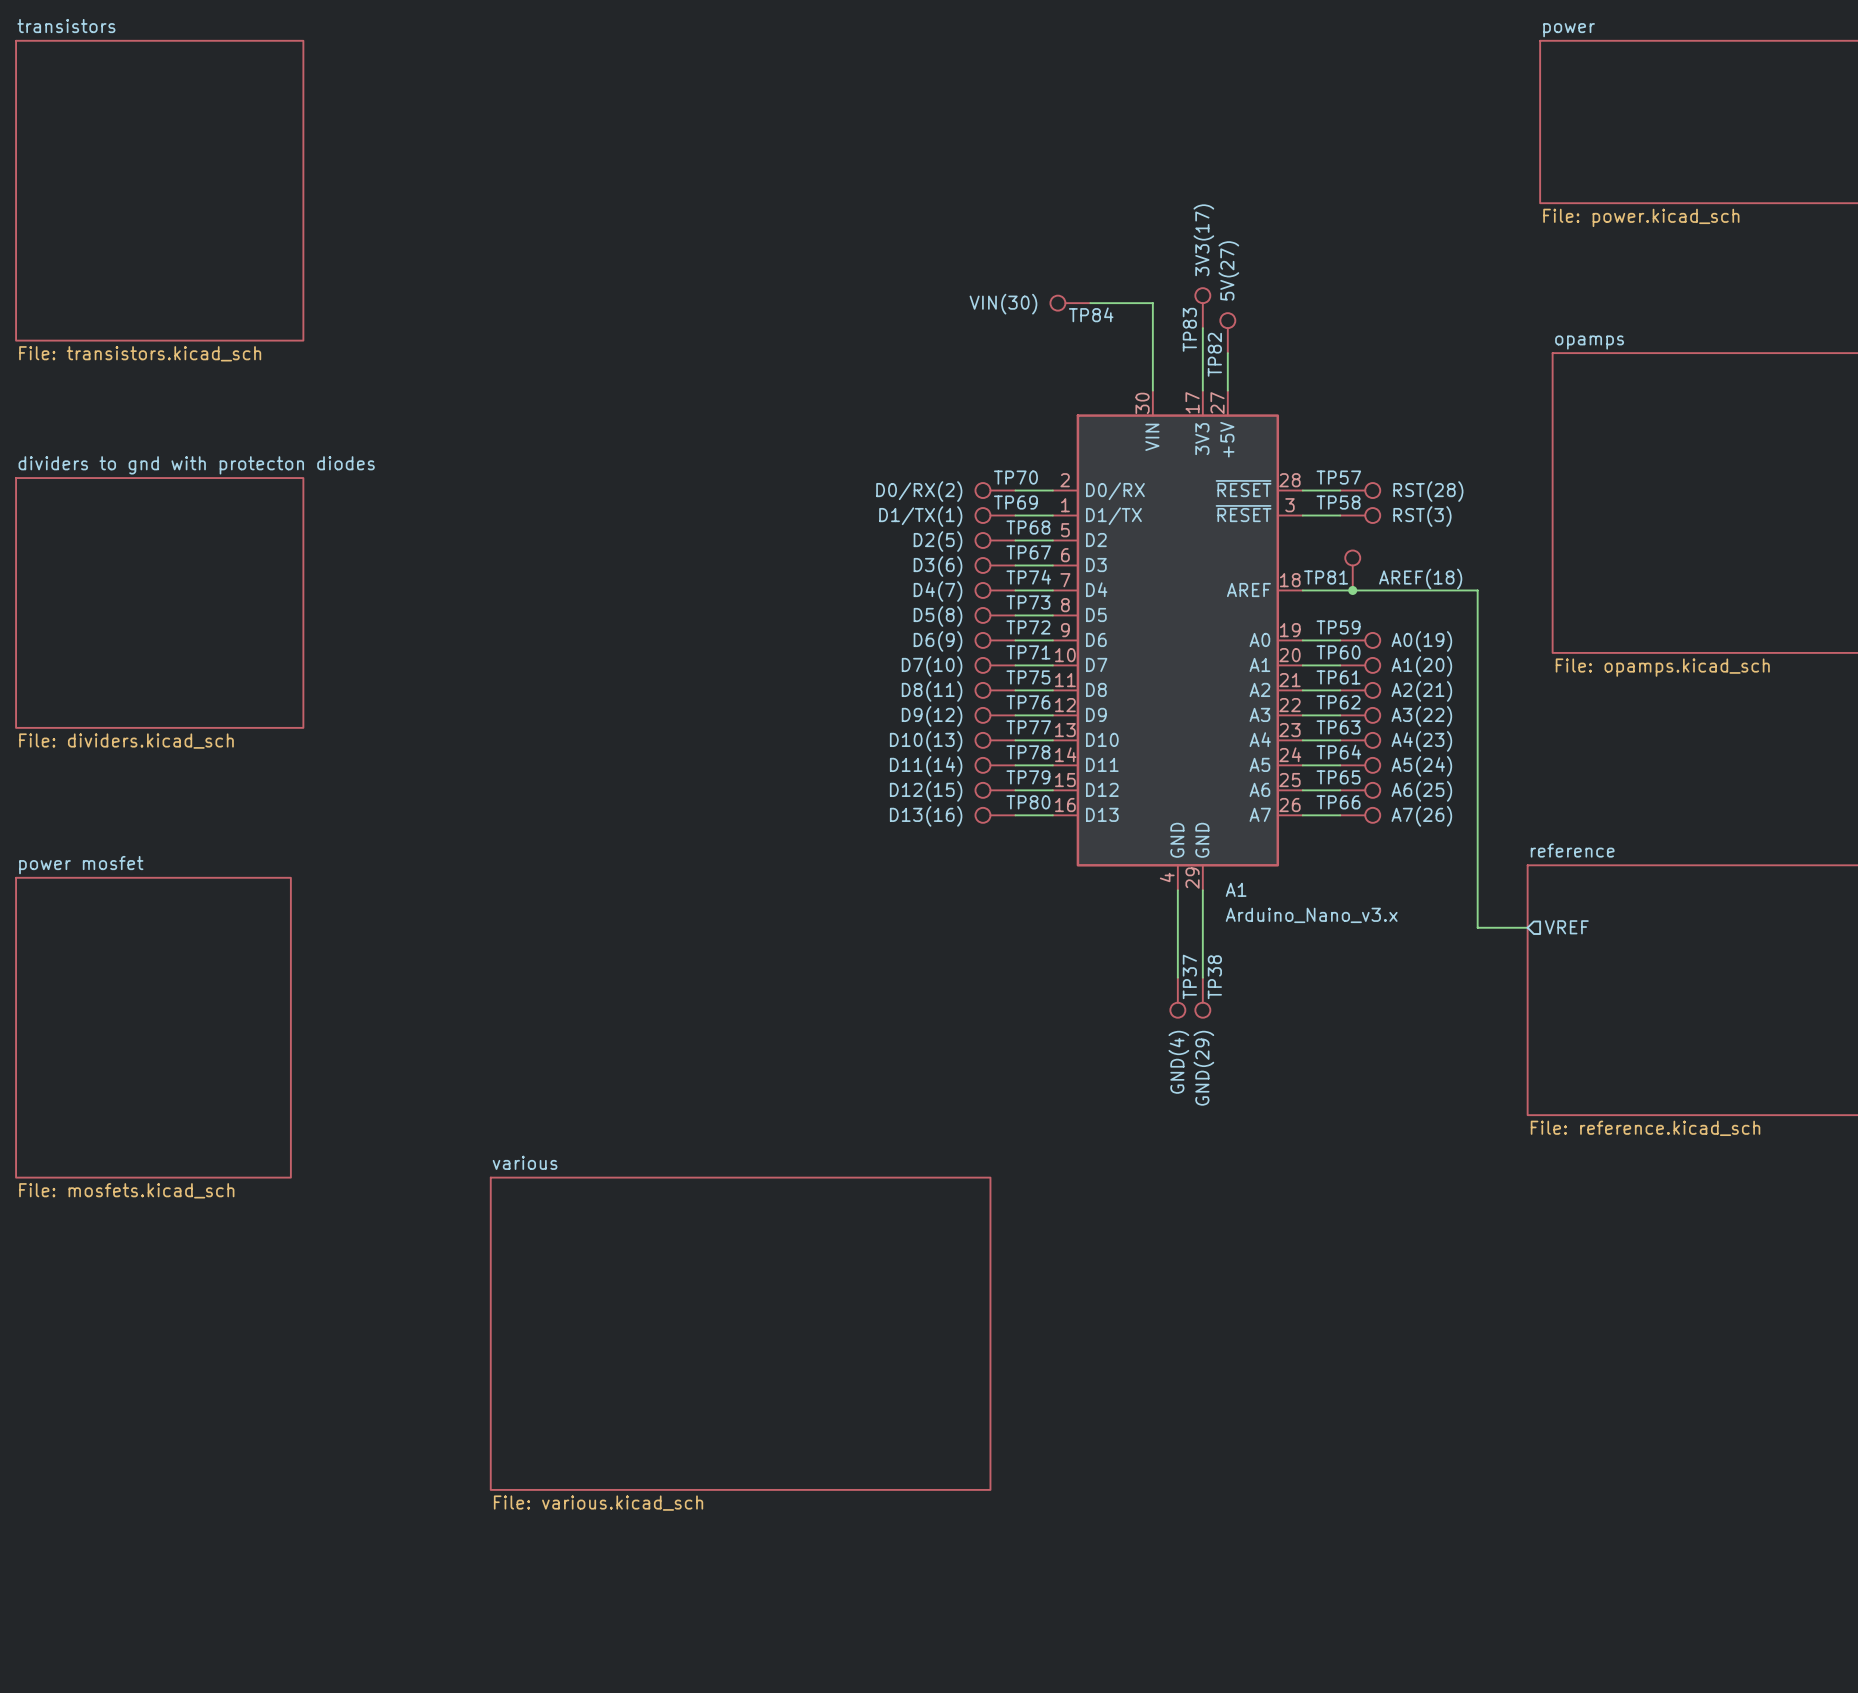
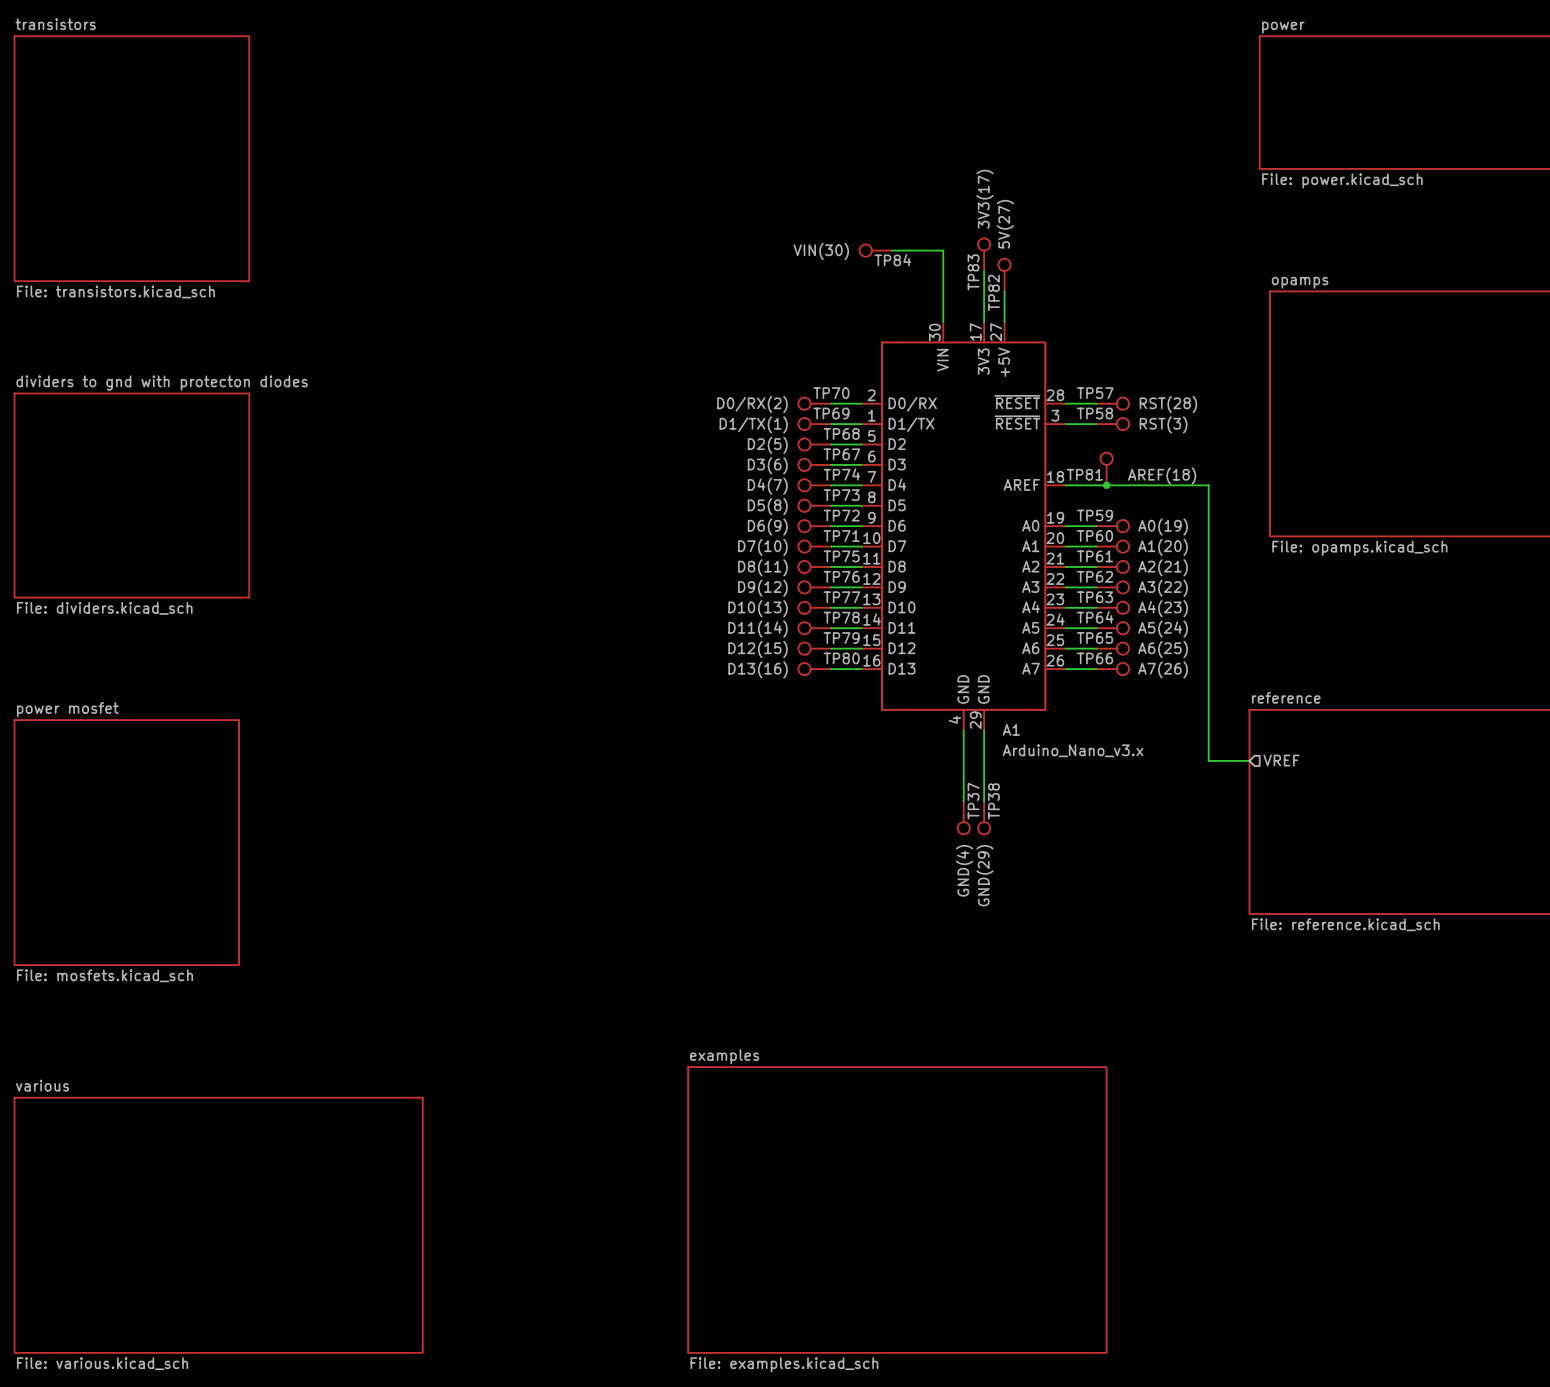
sheet various: File: various.kicad_sch (740, 1333) -> none
sheet examples: none -> File: examples.kicad_sch (897, 1209)
sheet various: none -> File: various.kicad_sch (218, 1225)

